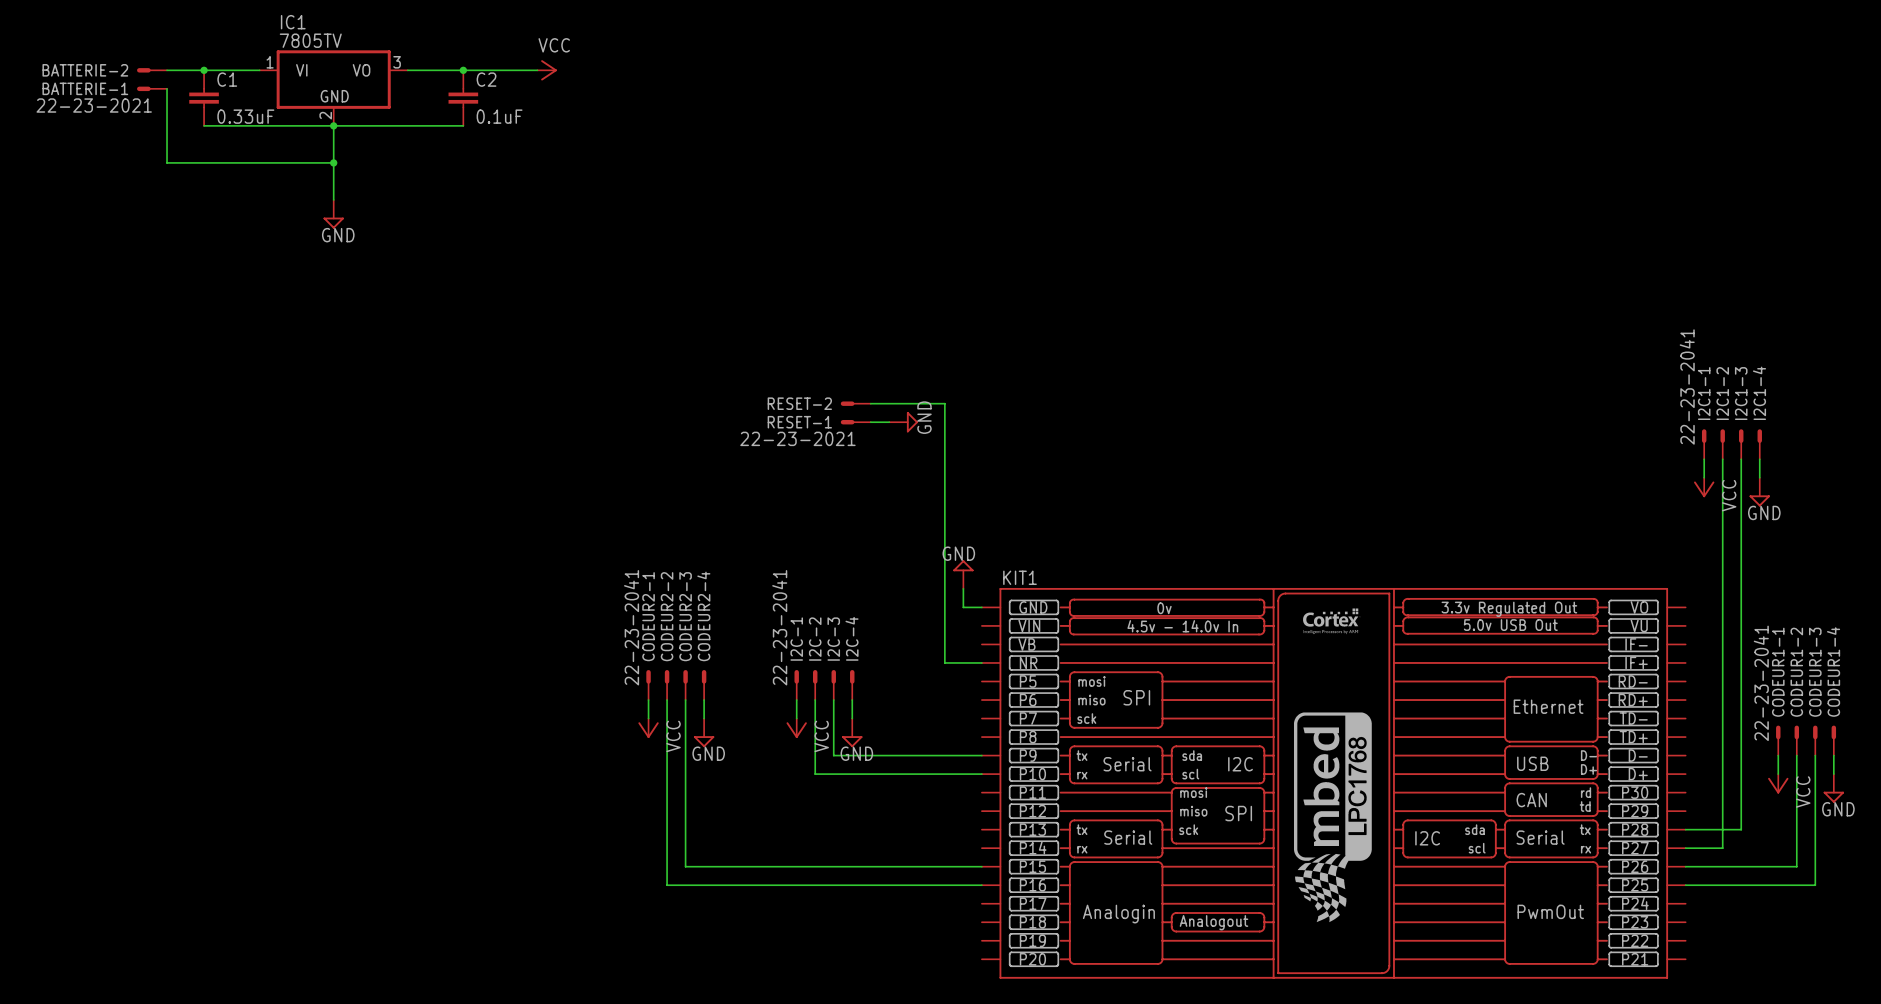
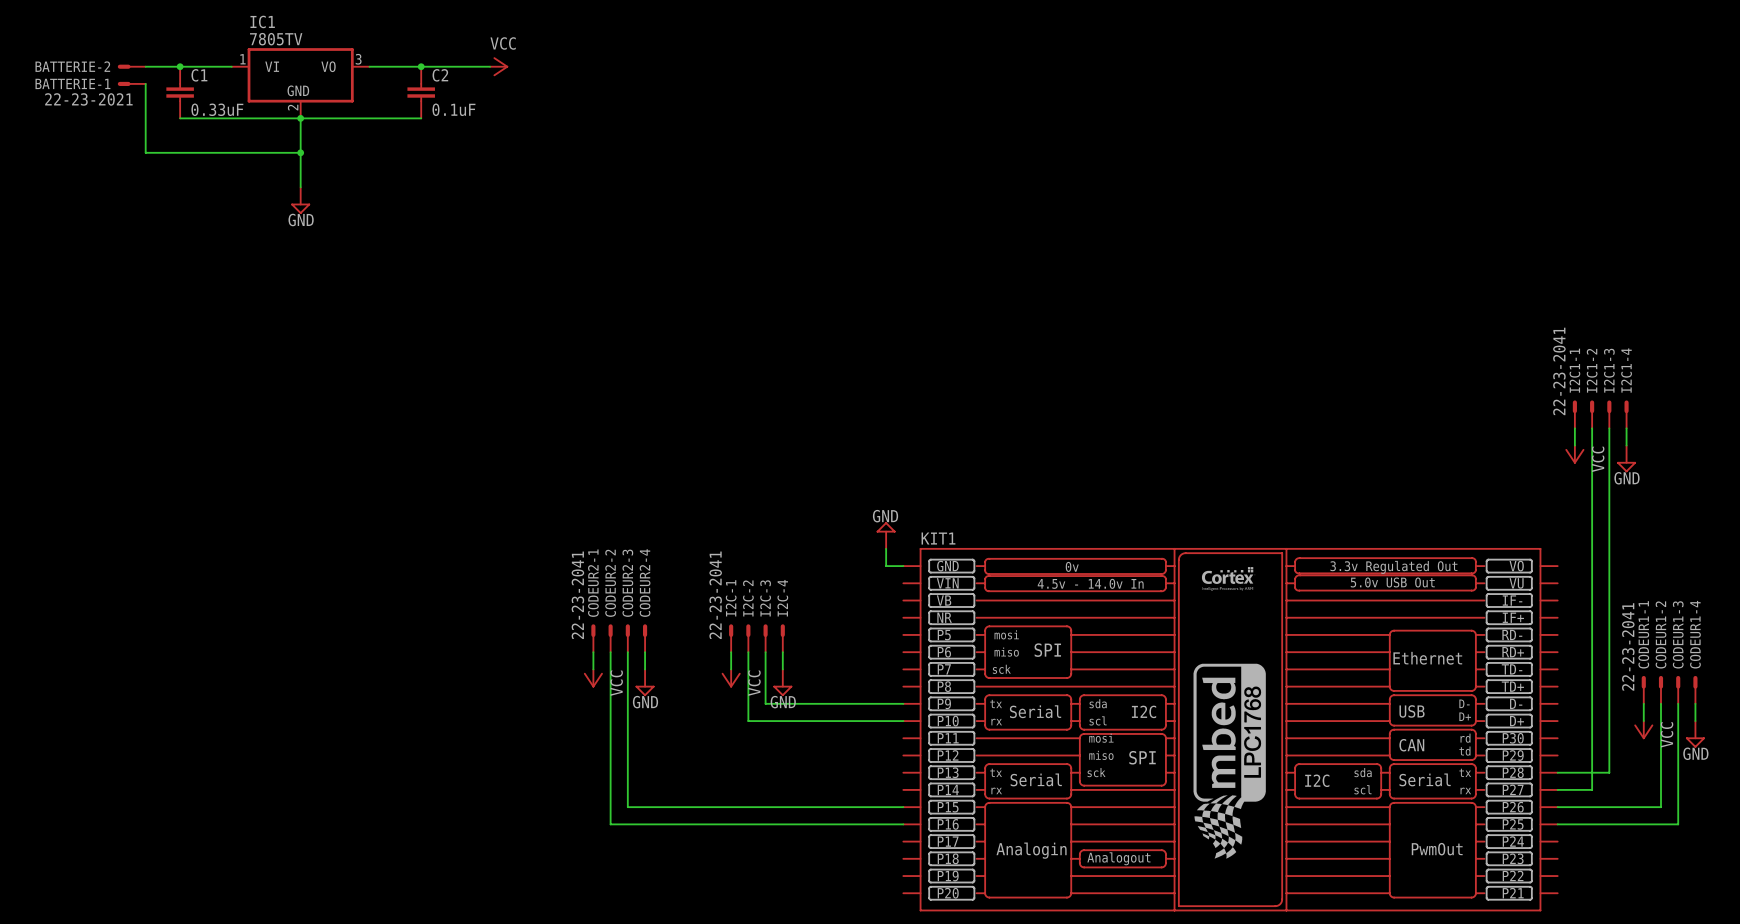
RESET-2: (855, 403) -> none
wire: (870, 403) (944, 403) (944, 662) (981, 662) -> none
RESET-1: 22-23-2021 (855, 422) -> none
wire: (870, 422) (889, 422) -> none
power symbol: GND (903, 422) -> none

